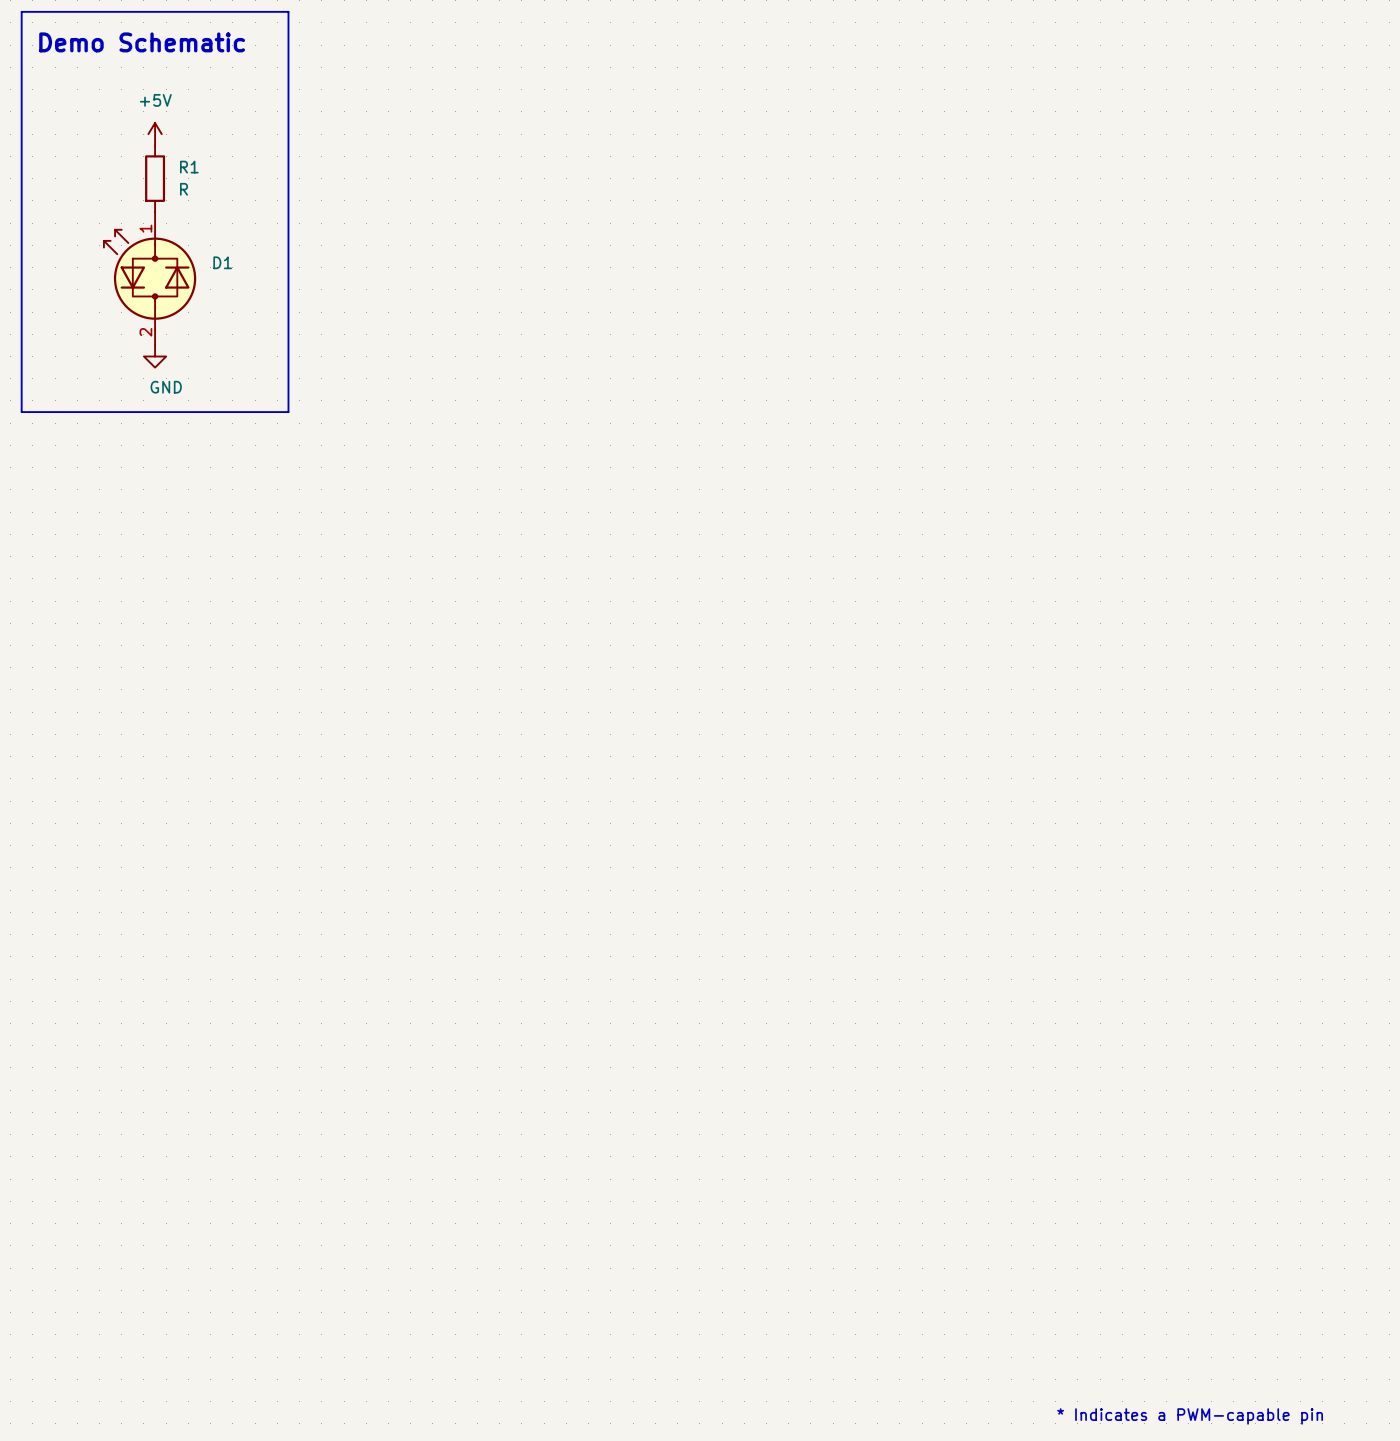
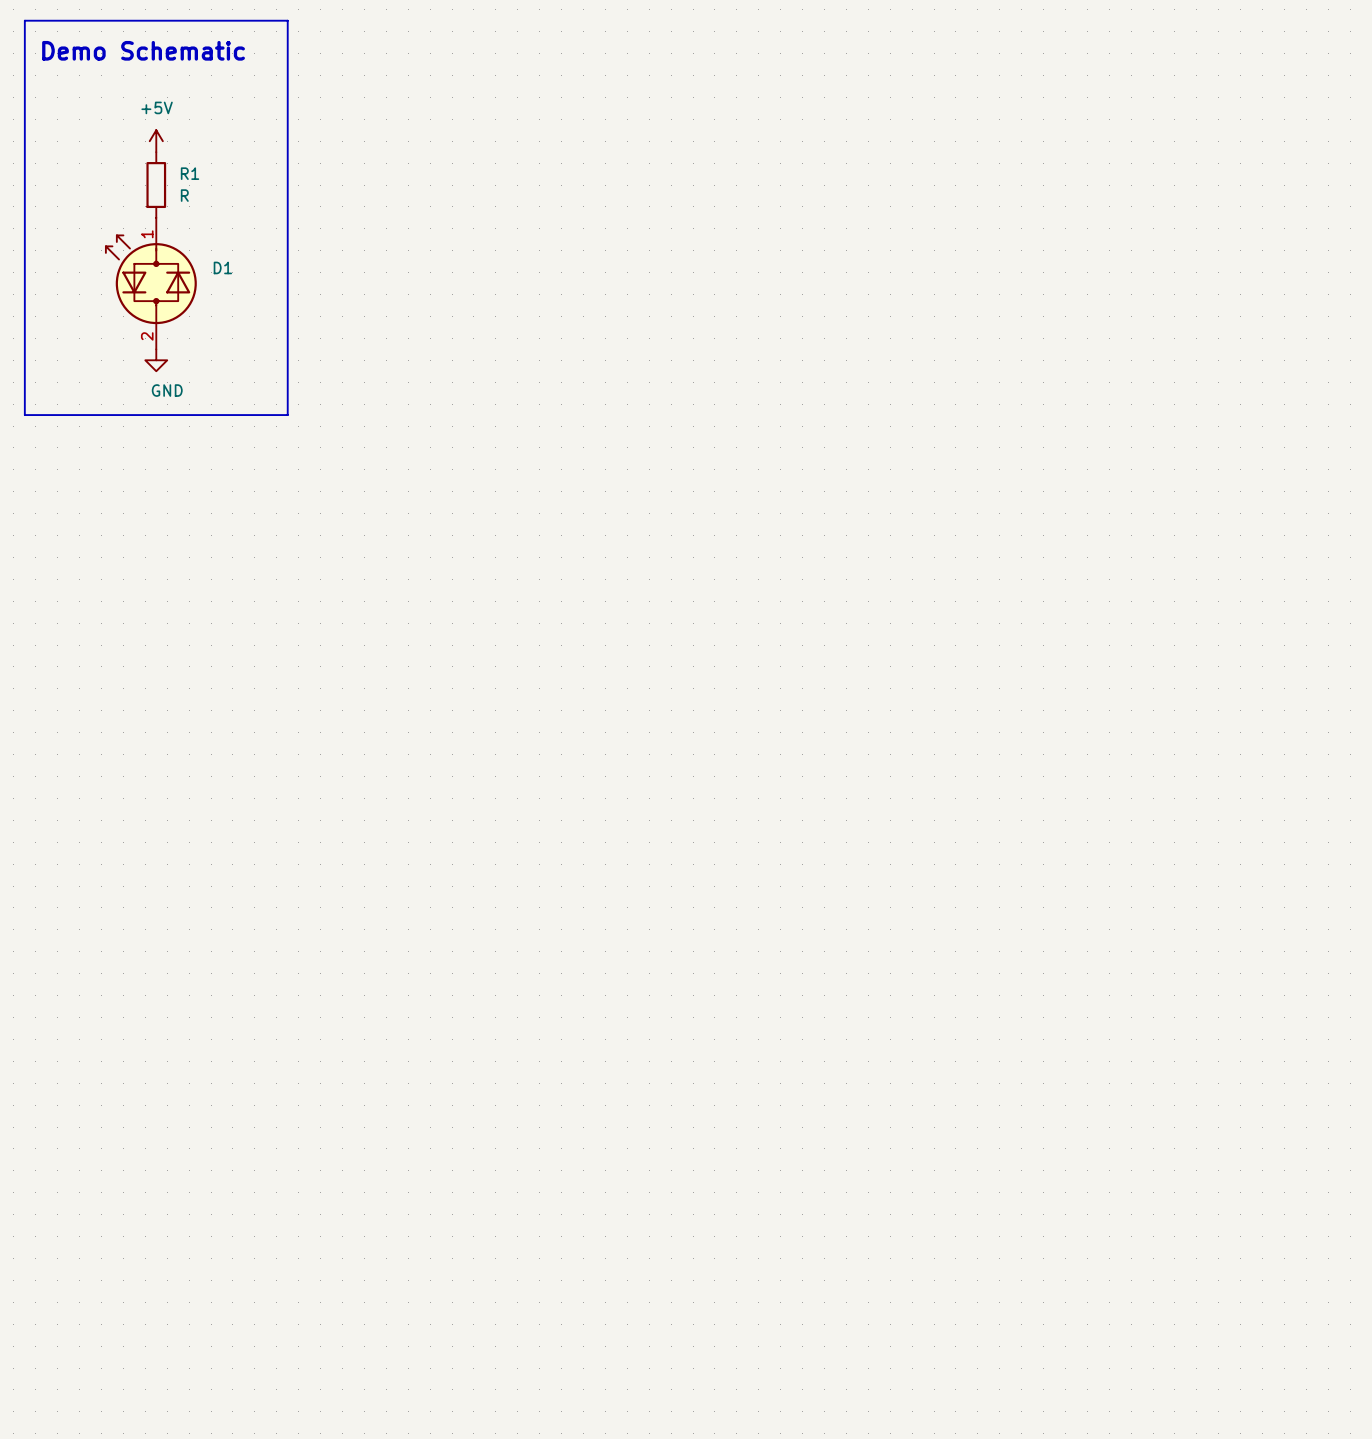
text: * Indicates a PWM-capable pin (1190, 1416) -> none

